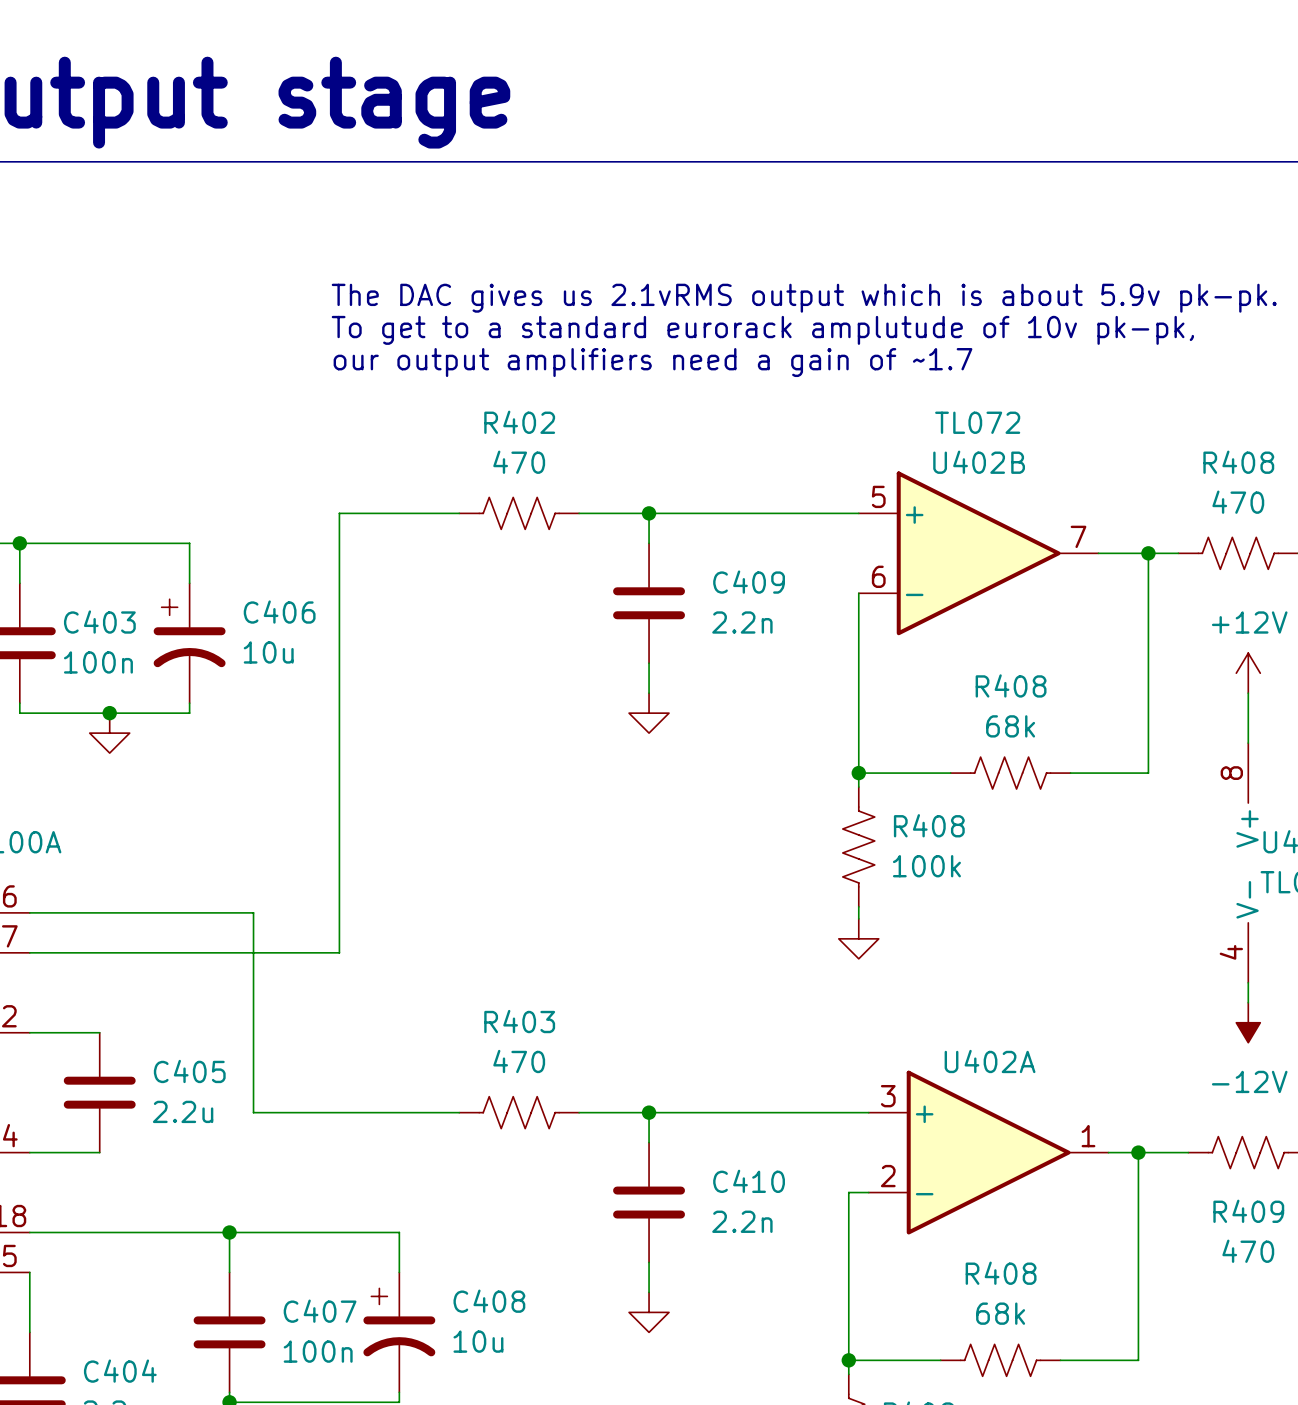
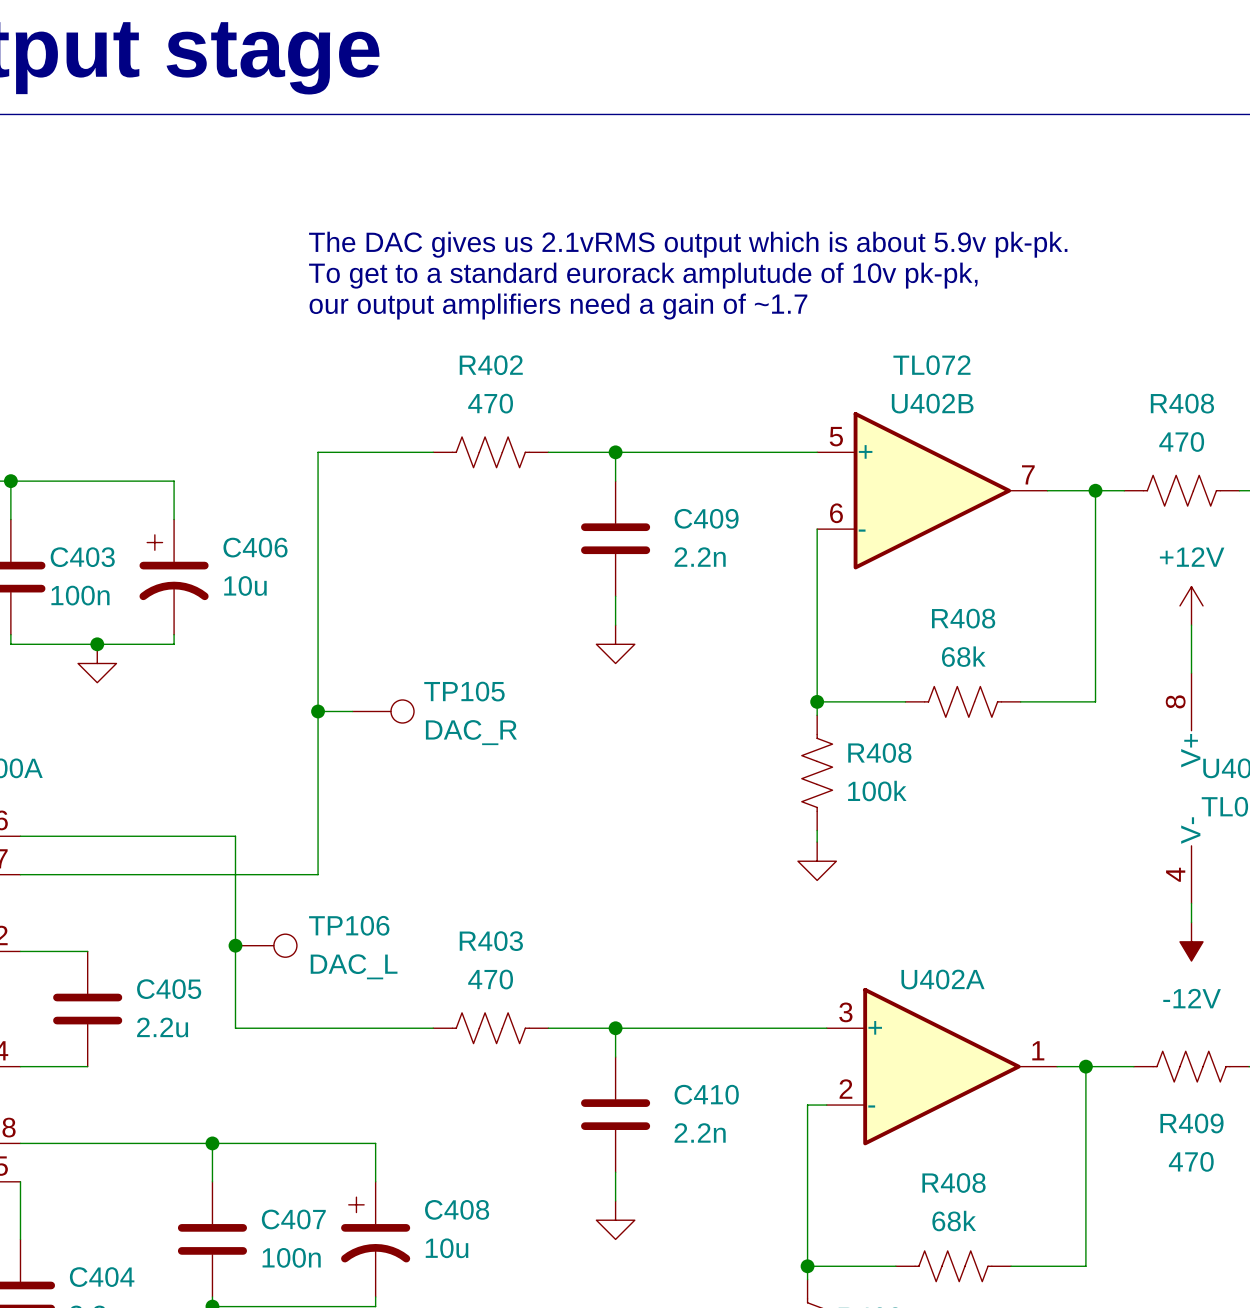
wire: none -> (318, 711) (352, 711)
junction: none -> (318, 711)
TP105: none -> DAC_R (383, 711)
junction: none -> (235, 945)
TP106: none -> DAC_L (266, 945)

